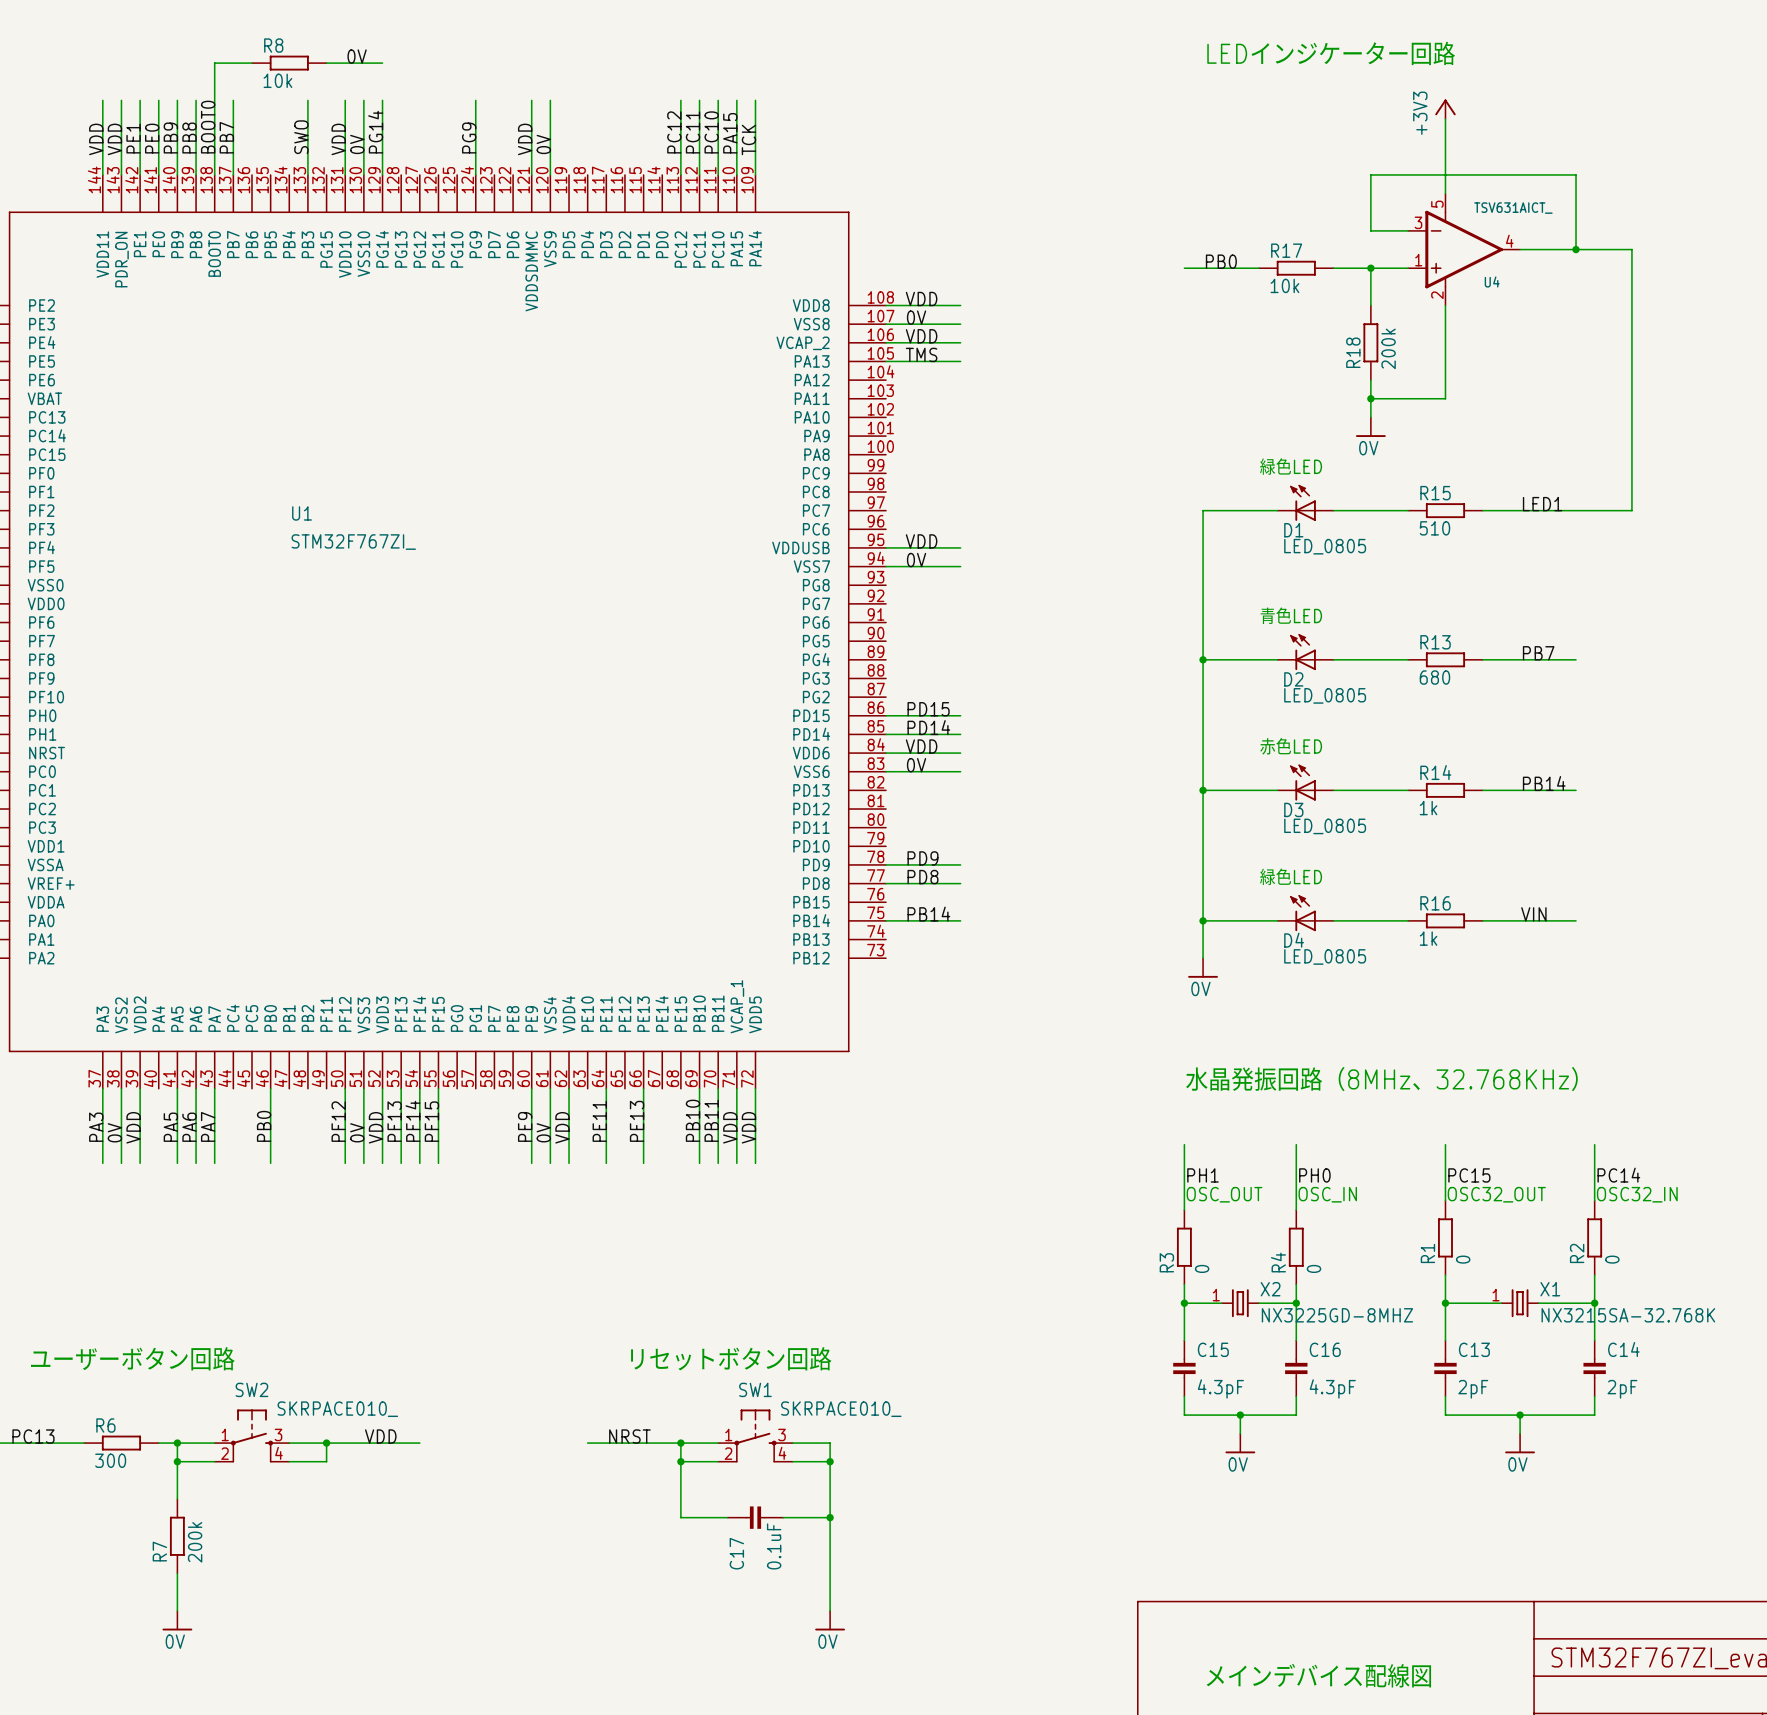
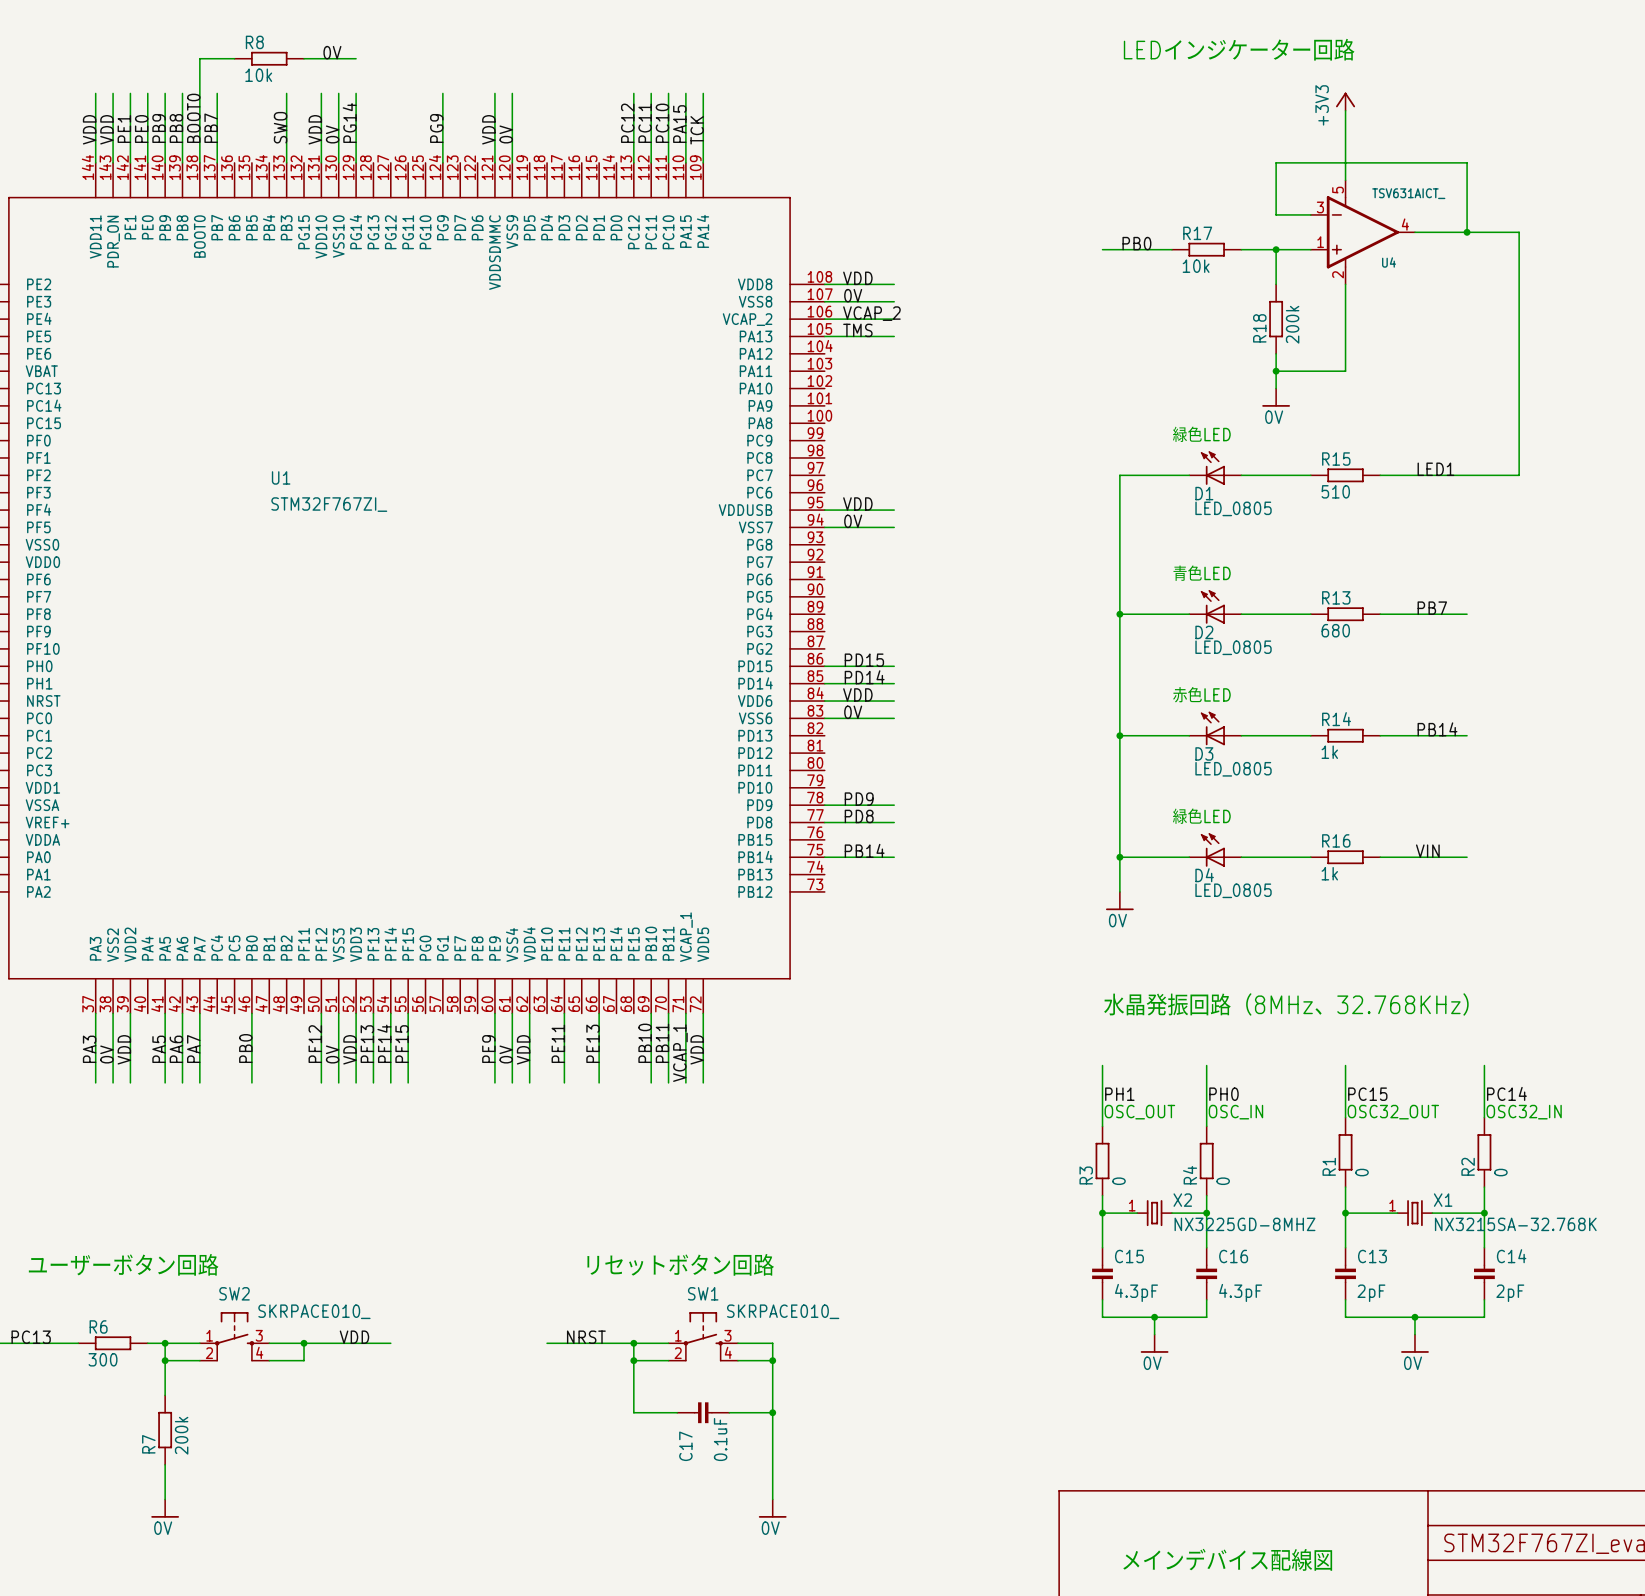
label: VDD (921, 336) -> VCAP_2 (871, 313)
label: VDD (730, 1127) -> none
label: none -> VCAP_1 (680, 1053)

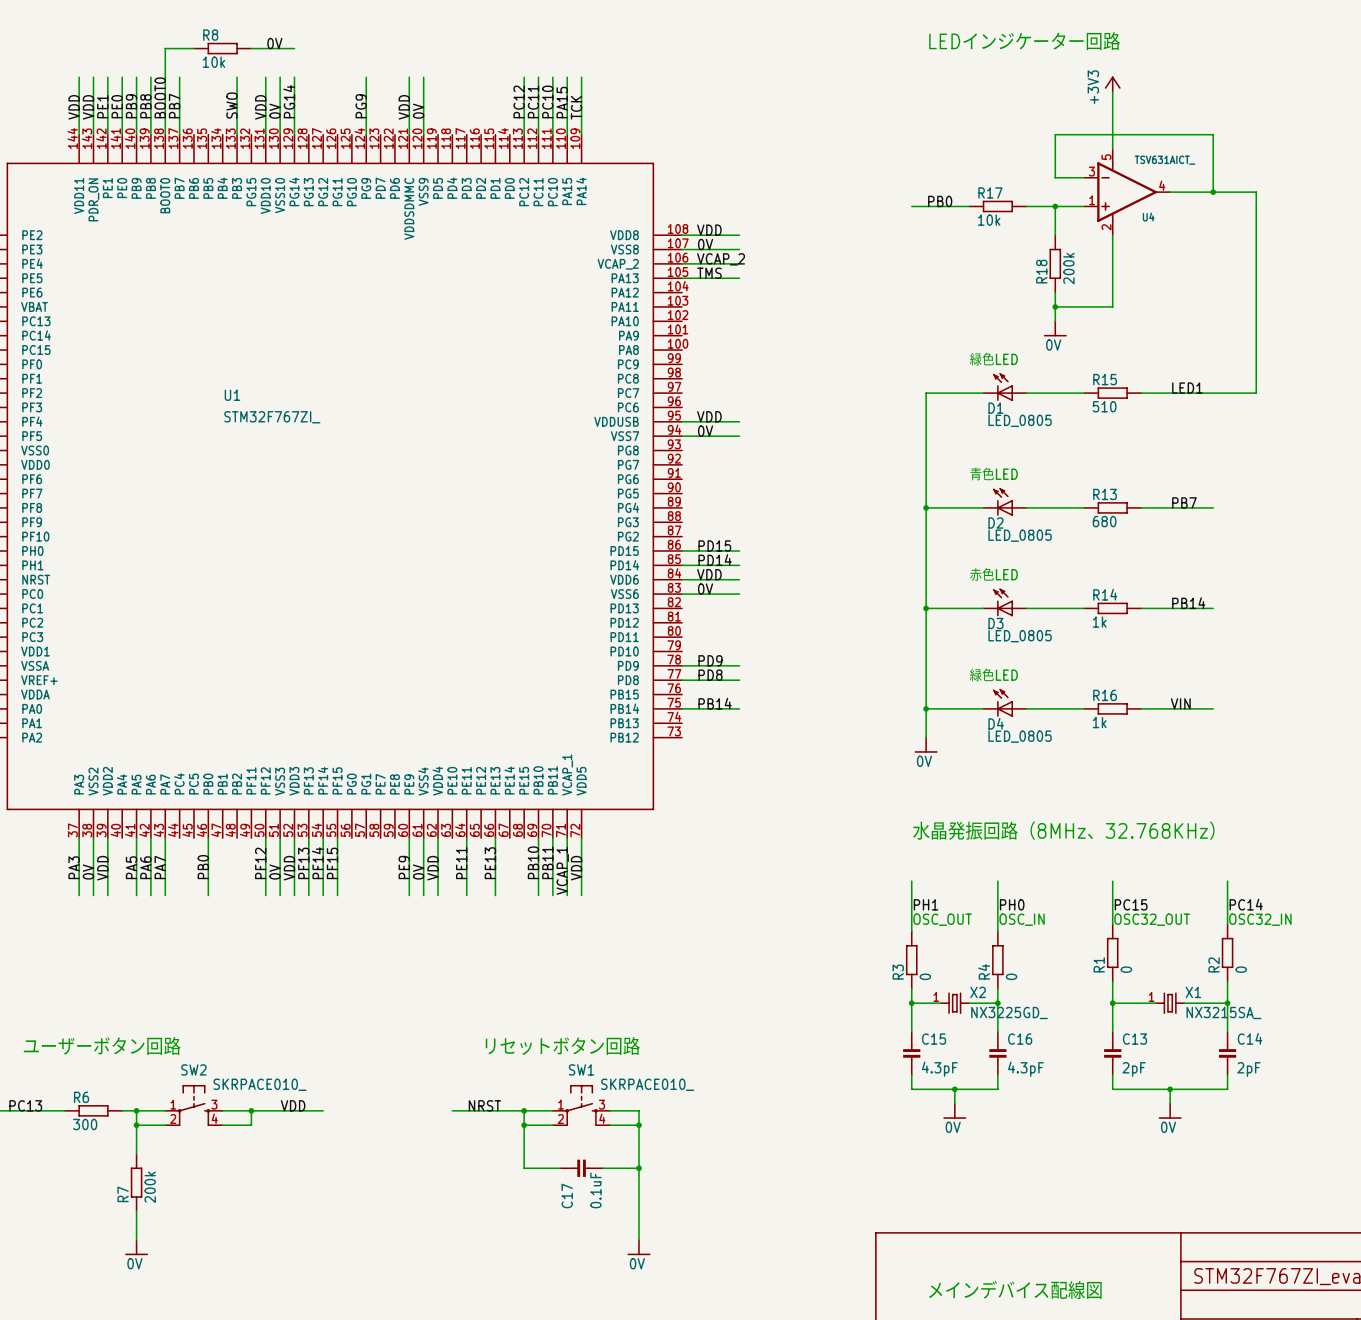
X2 value: NX3225GD-8MHZ (1244, 1224) -> NX3225GD_ (1009, 1013)
X1 value: NX3215SA-32.768K (1515, 1224) -> NX3215SA_ (1223, 1013)

